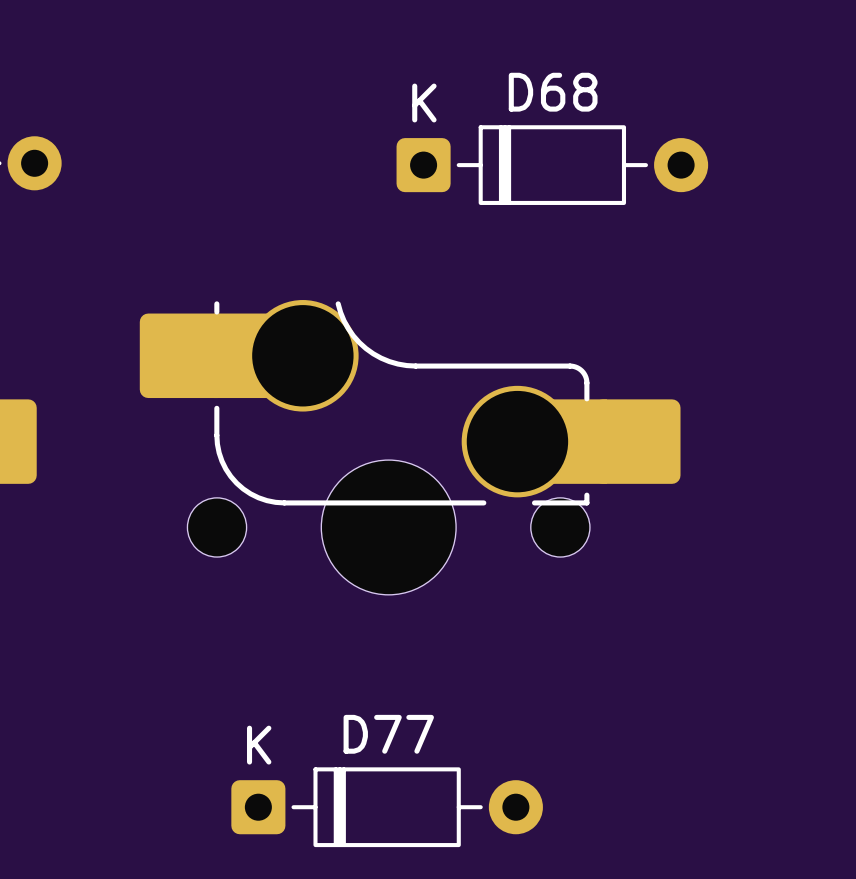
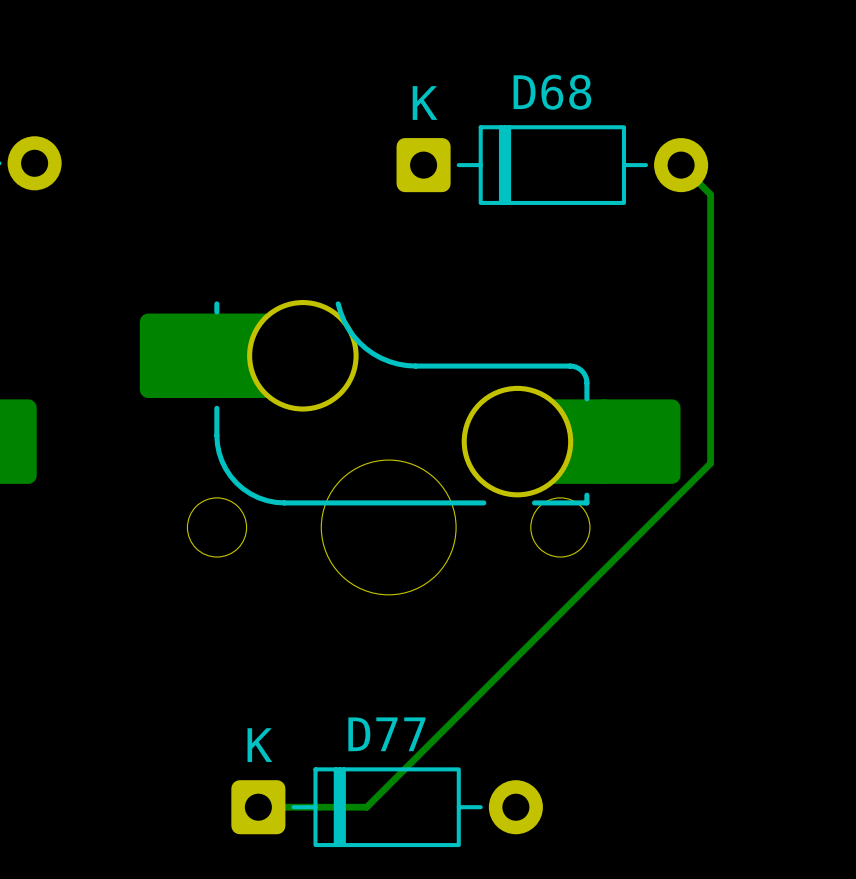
track: none -> (681, 165) (710, 194) (710, 463) (366, 807) (258, 807)

